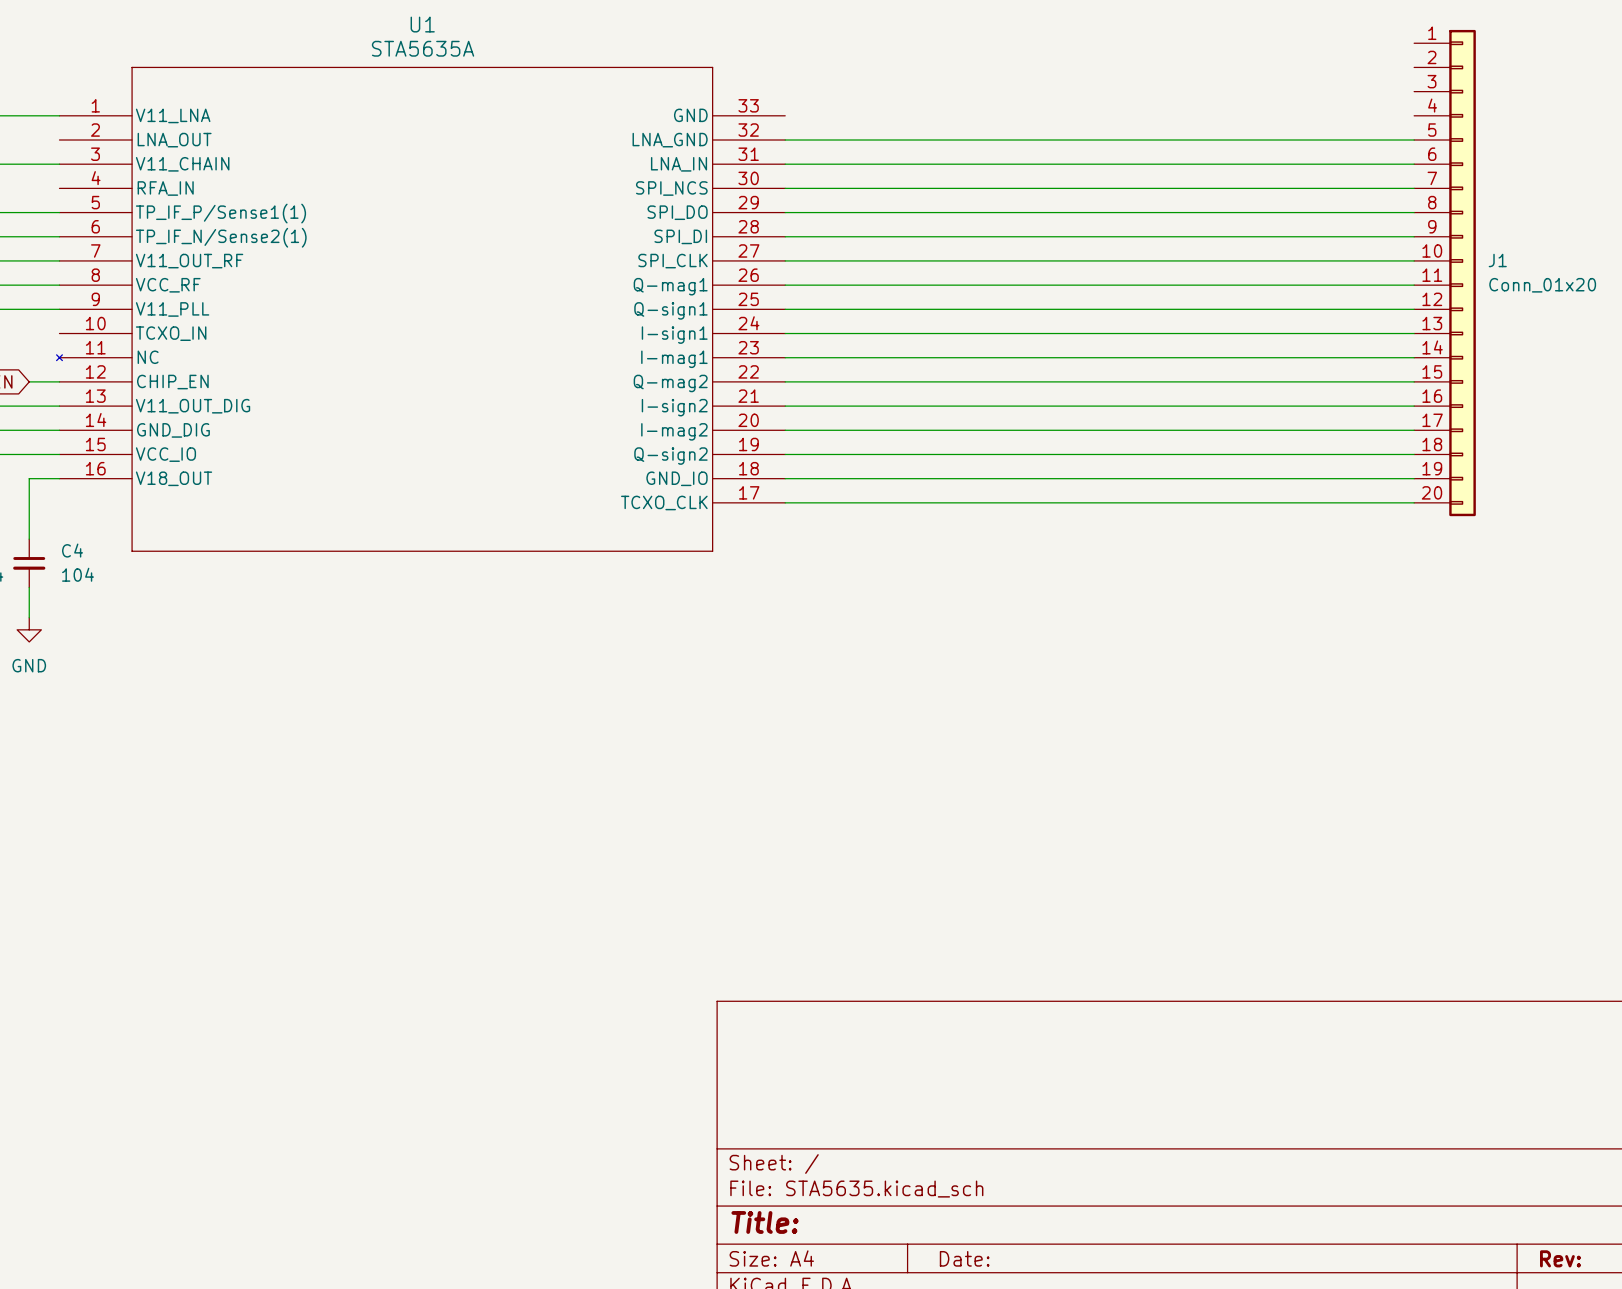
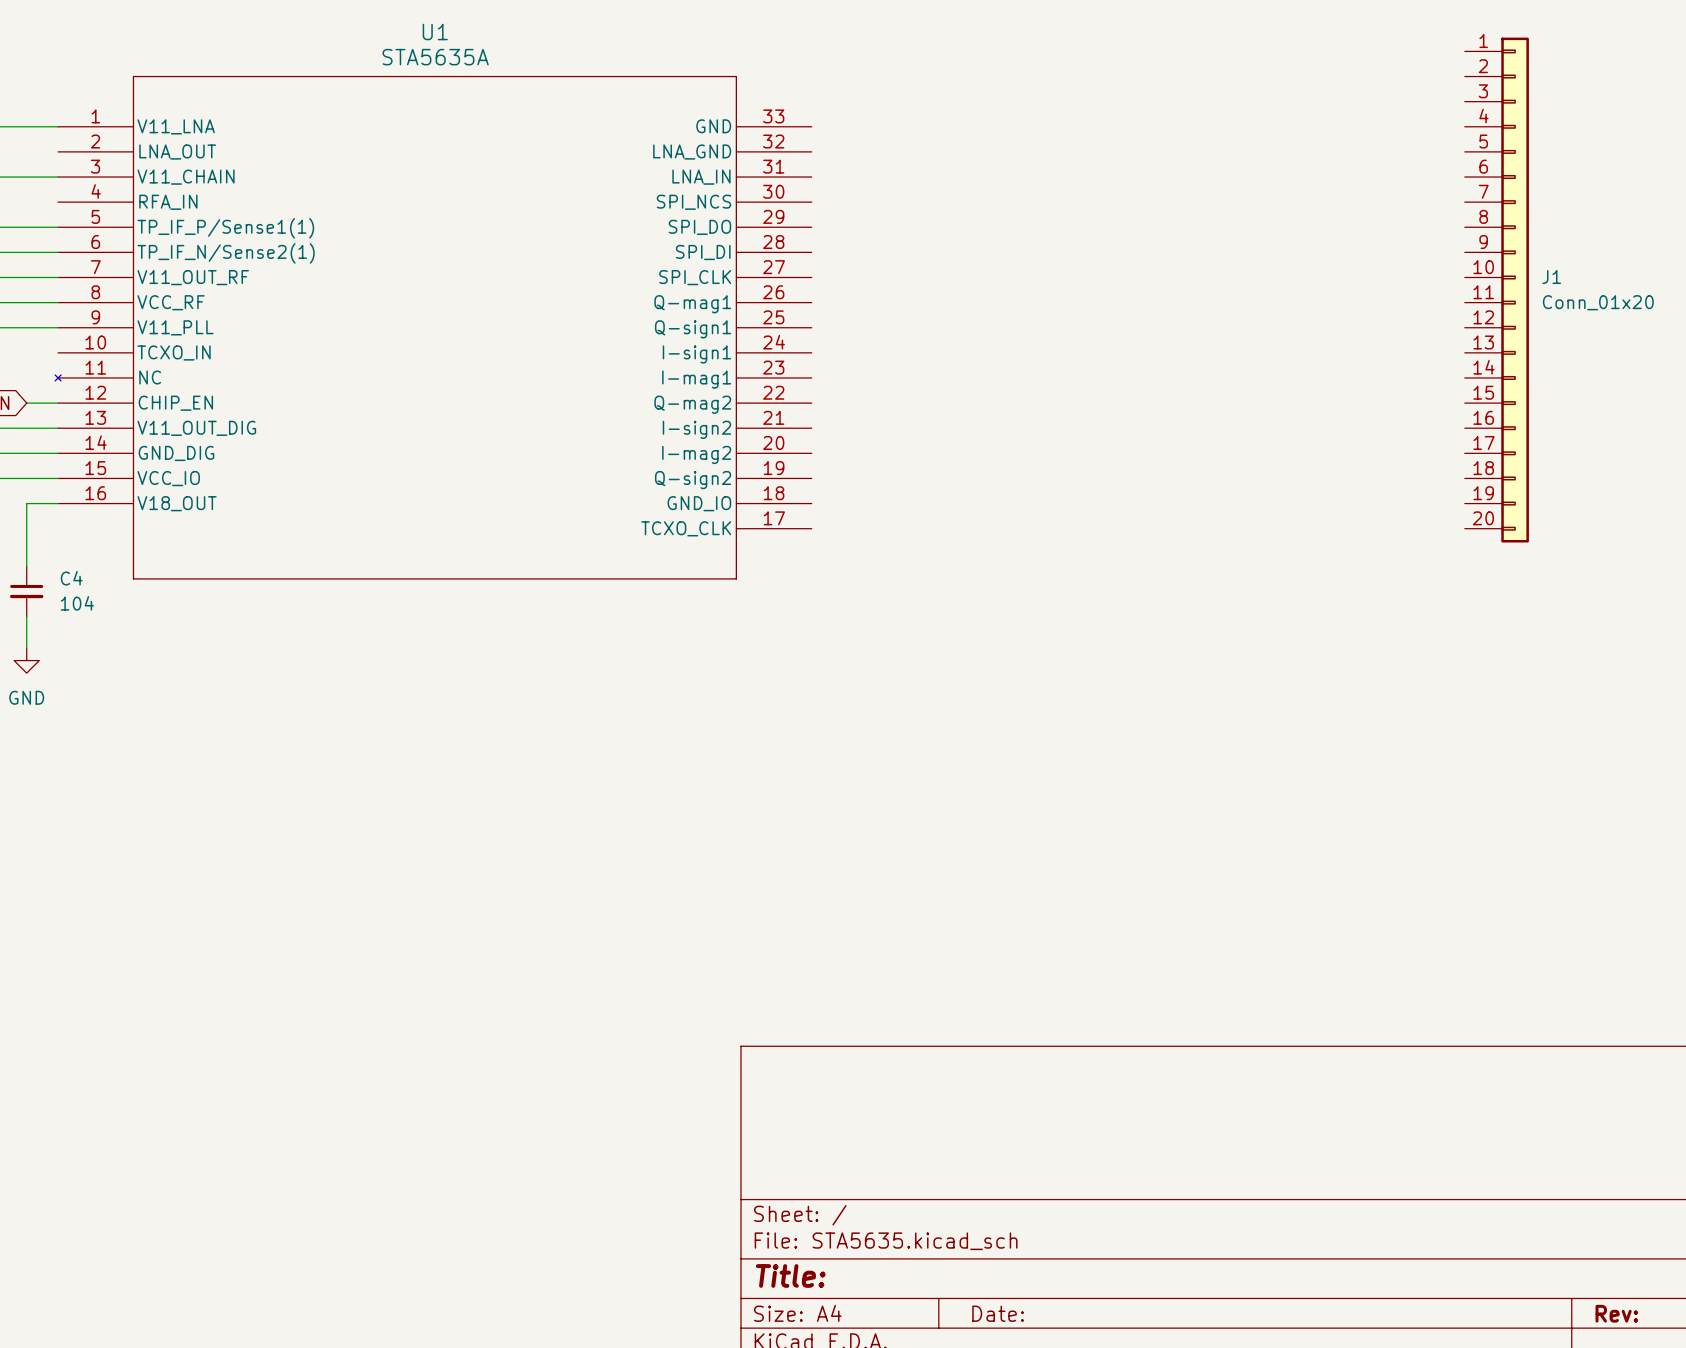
wire: (785, 140) (1414, 140) -> none
wire: (785, 164) (1414, 164) -> none
wire: (785, 188) (1414, 188) -> none
wire: (785, 212) (1414, 212) -> none
wire: (785, 236) (1414, 236) -> none
wire: (785, 260) (1414, 260) -> none
wire: (785, 285) (1414, 285) -> none
wire: (785, 309) (1414, 309) -> none
wire: (785, 333) (1414, 333) -> none
wire: (785, 357) (1414, 357) -> none
wire: (785, 381) (1414, 381) -> none
wire: (785, 406) (1414, 406) -> none
wire: (785, 430) (1414, 430) -> none
wire: (785, 454) (1414, 454) -> none
wire: (785, 478) (1414, 478) -> none
wire: (785, 502) (1414, 502) -> none

